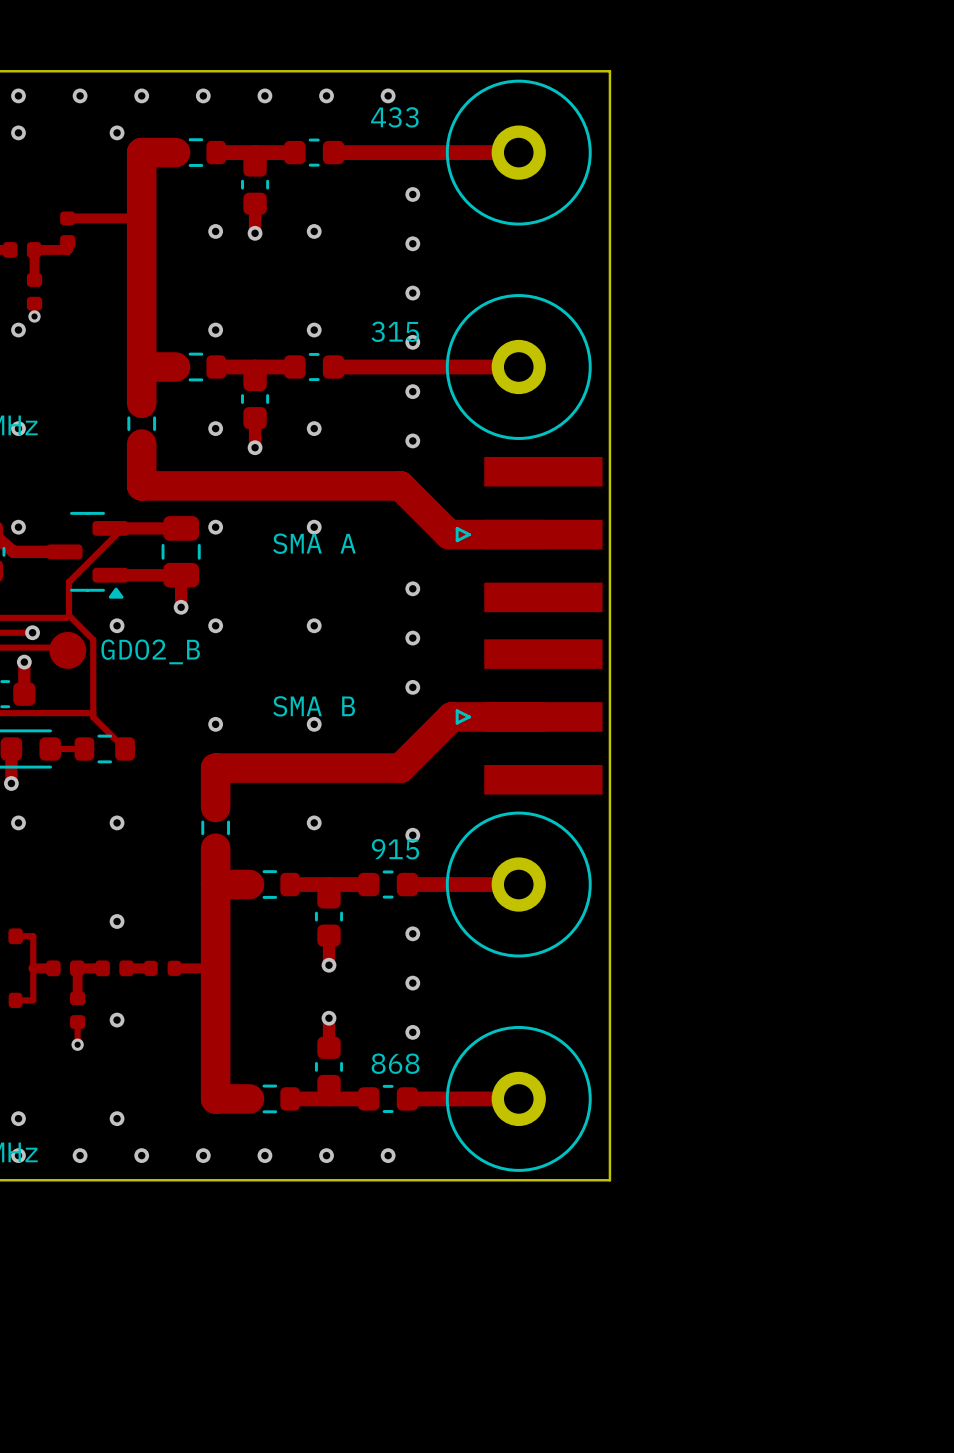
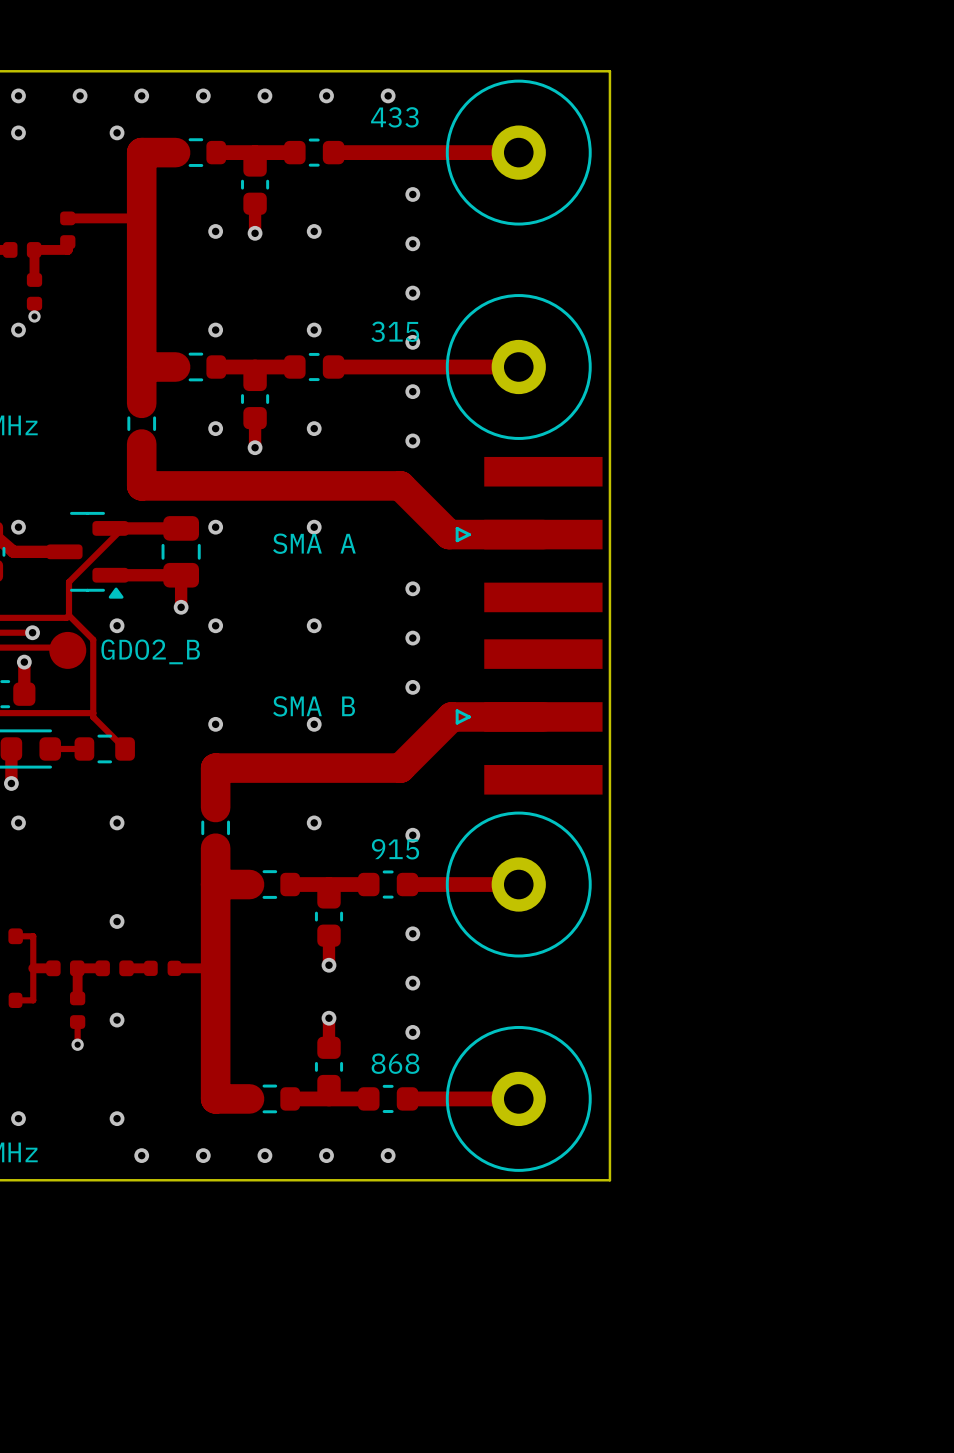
via: (18, 428) -> none
via: (18, 1155) -> none
via: (80, 1155) -> none

